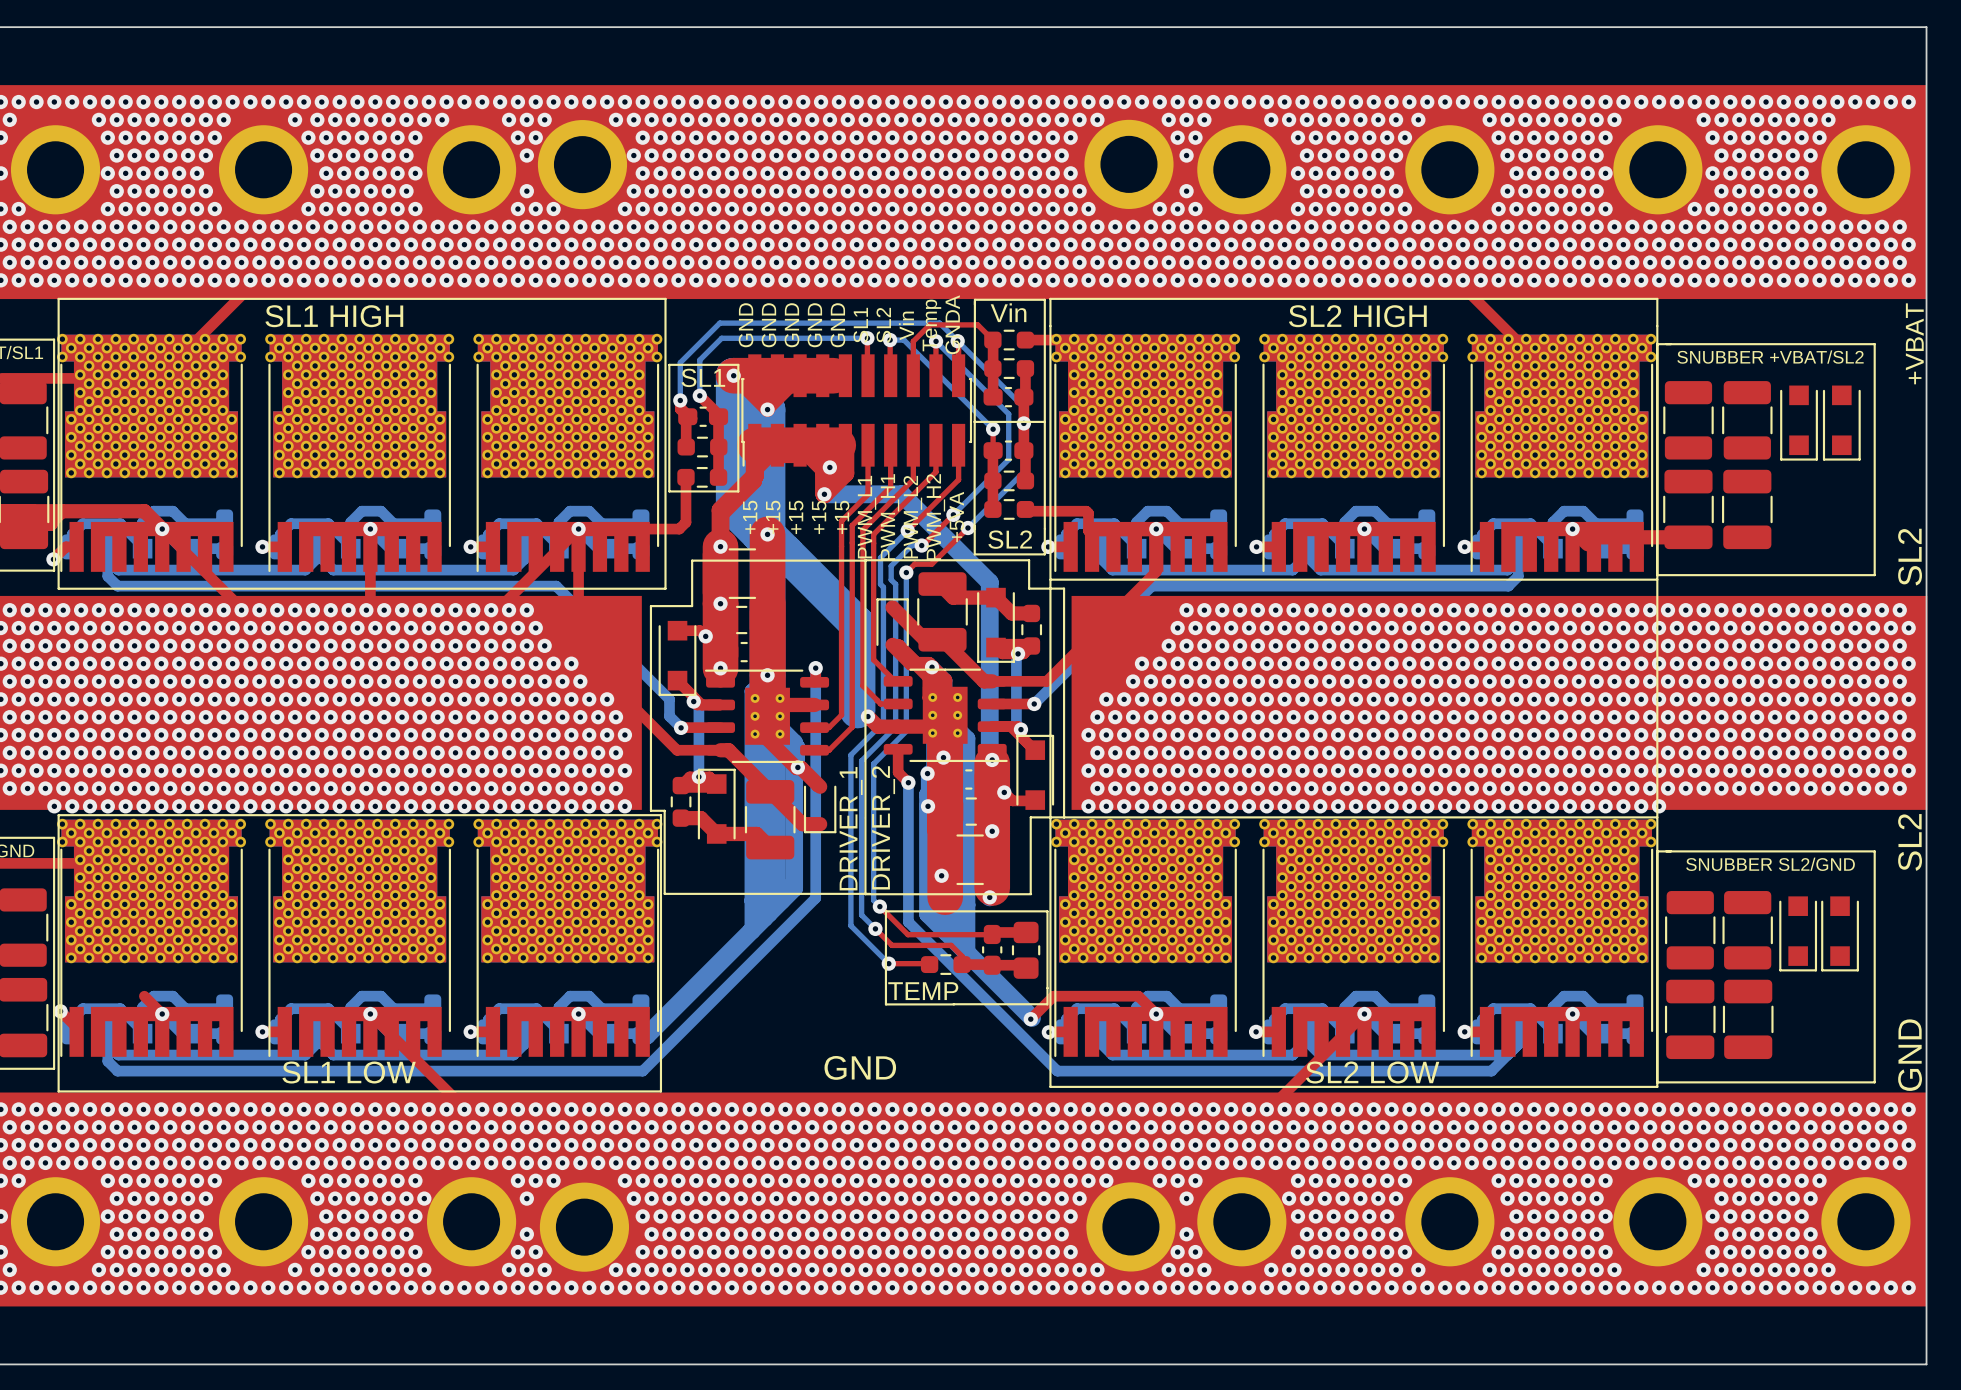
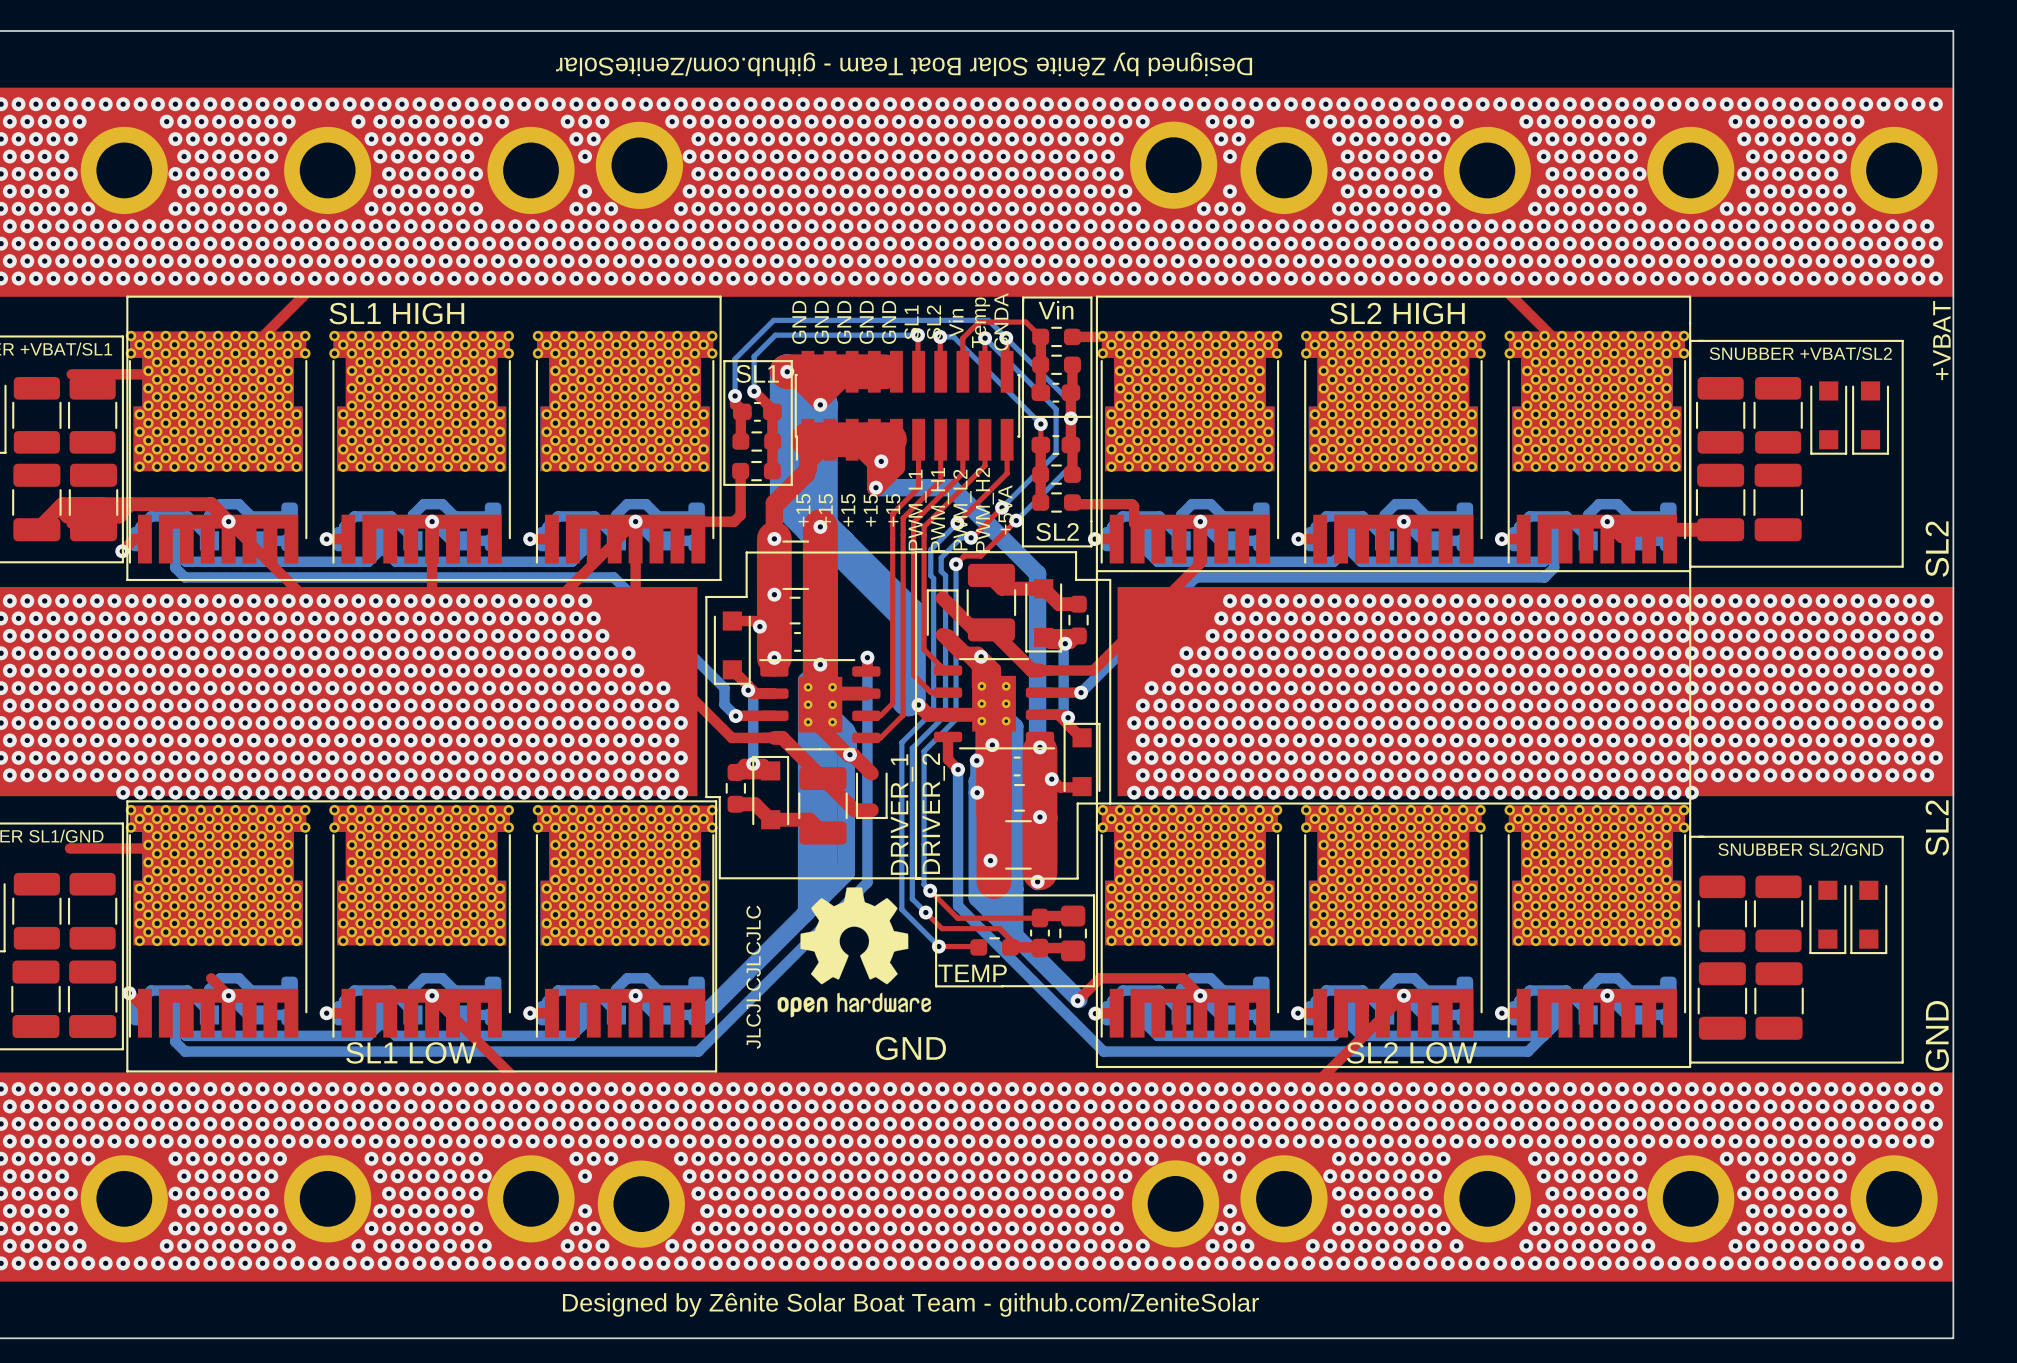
text: none -> Designed by Zênite Solar Boat Team - github.com/ZeniteSolar (904, 64)
drawing: none -> [777, 887, 932, 1018]
text: none -> JLCJLCJLCJLC (753, 977)
text: none -> Designed by Zênite Solar Boat Team - github.com/ZeniteSolar (910, 1304)

